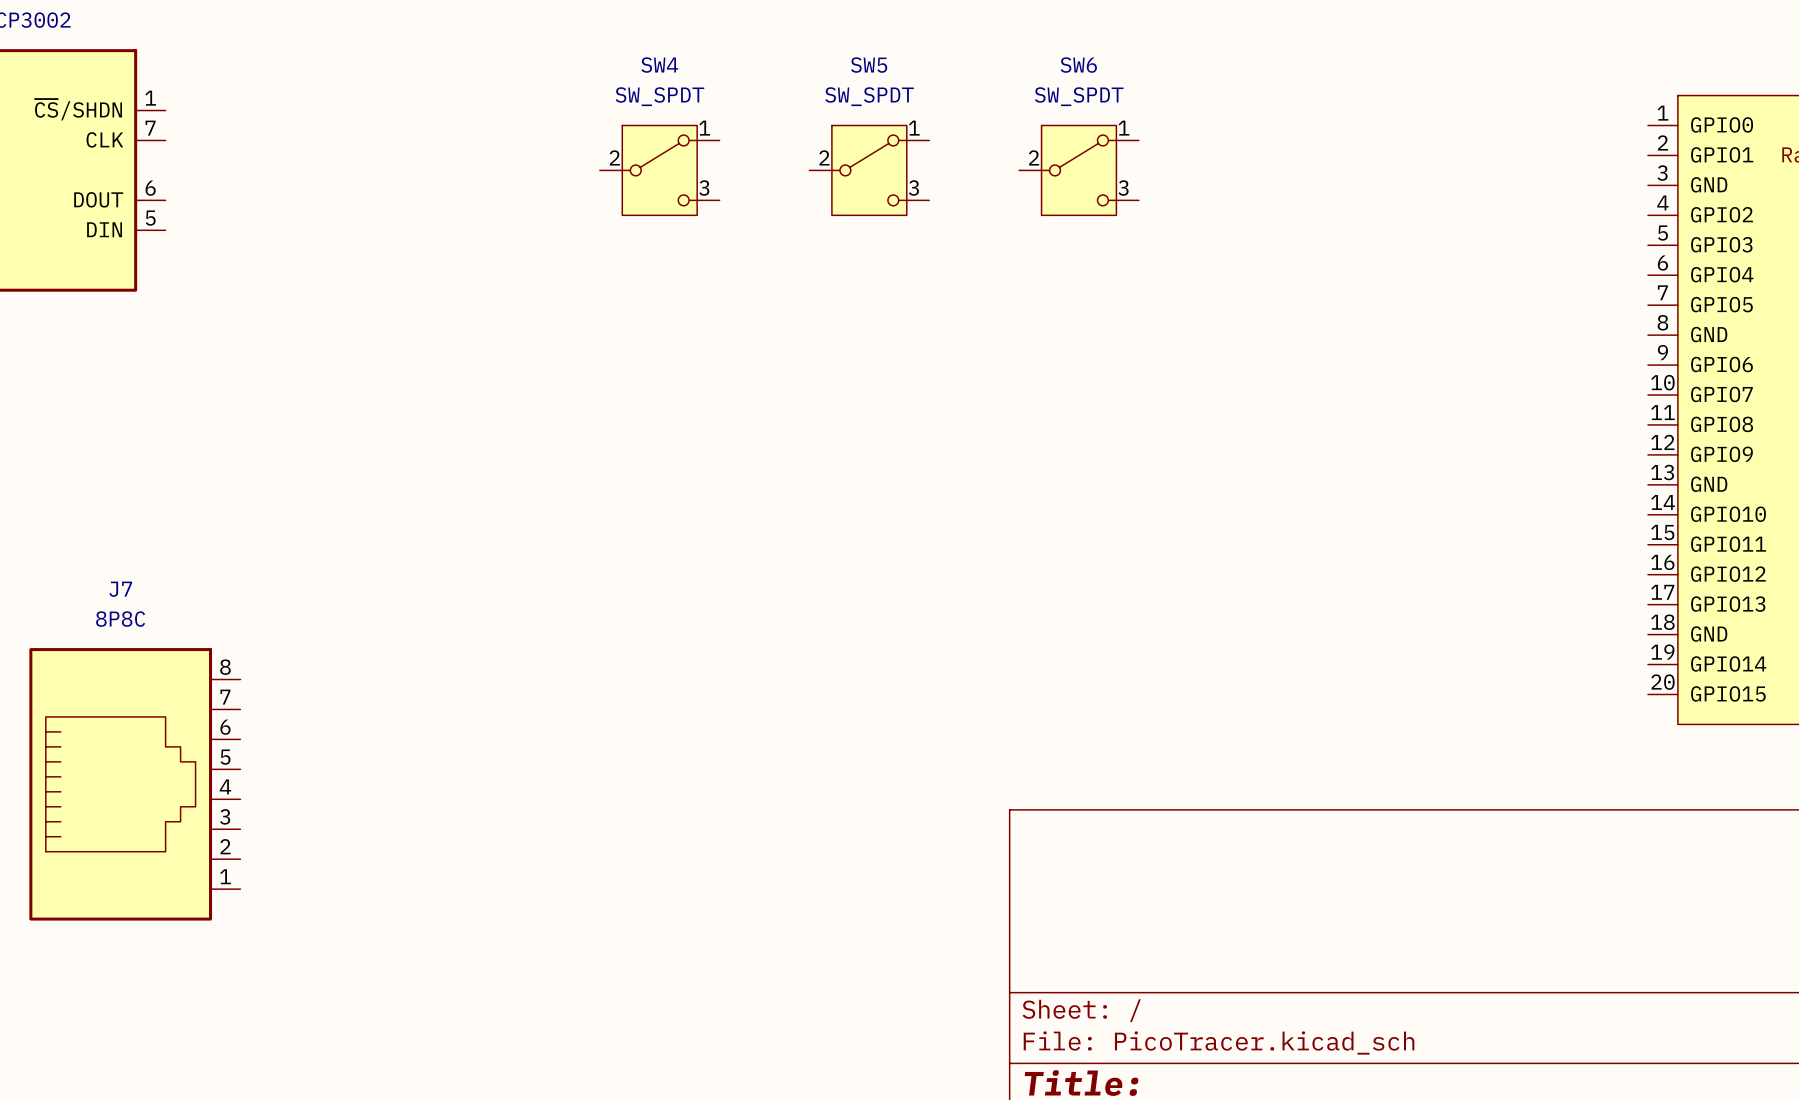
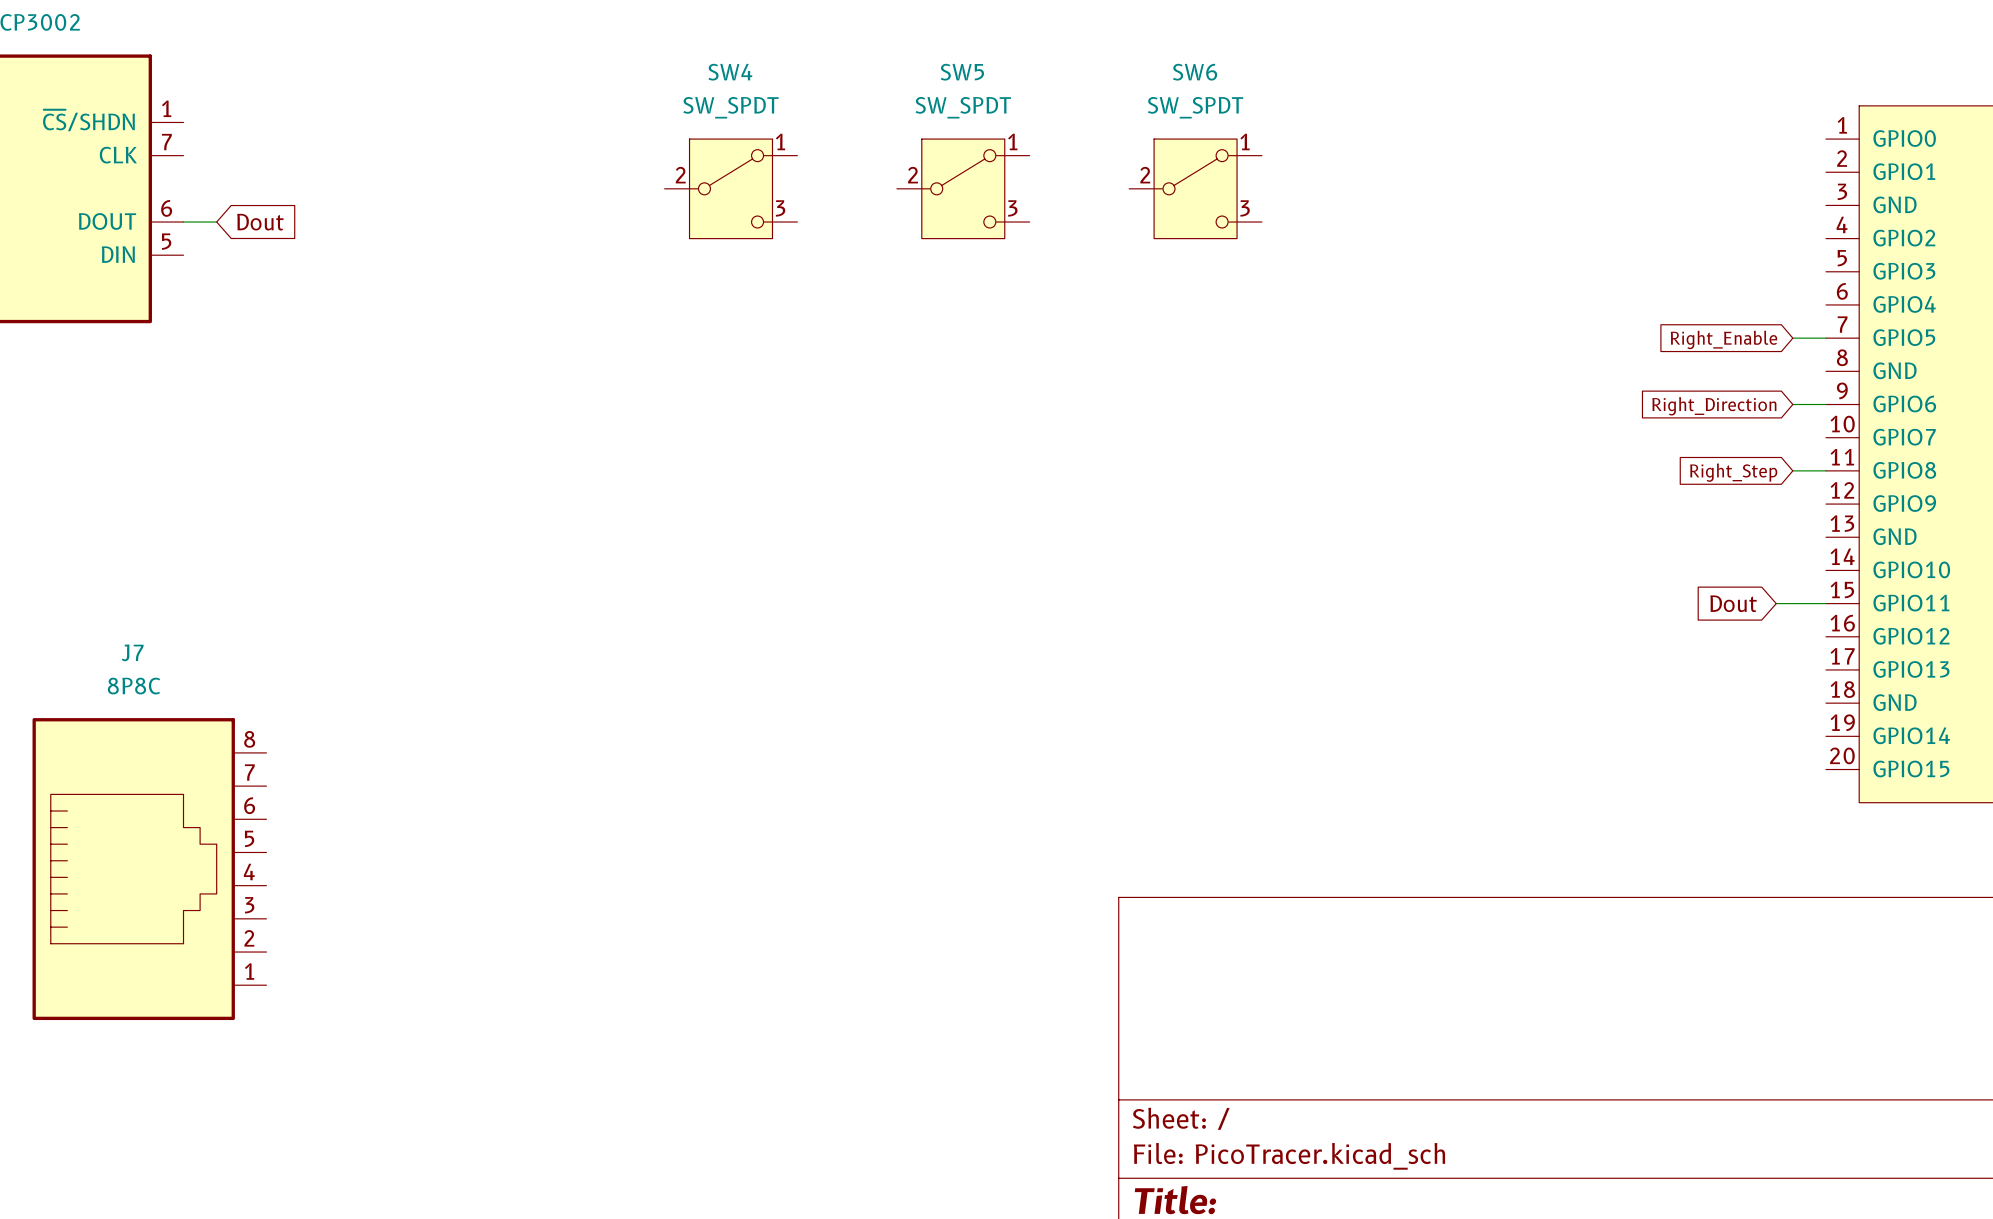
wire: none -> (183, 222) (216, 222)
global label: none -> Dout (260, 222)
wire: none -> (1792, 338) (1826, 338)
global label: none -> Right_Enable (1723, 339)
wire: none -> (1792, 404) (1826, 404)
global label: none -> Right_Direction (1714, 406)
wire: none -> (1792, 470) (1826, 470)
global label: none -> Right_Step (1733, 472)
global label: none -> Dout (1733, 603)
wire: none -> (1776, 603) (1826, 603)

